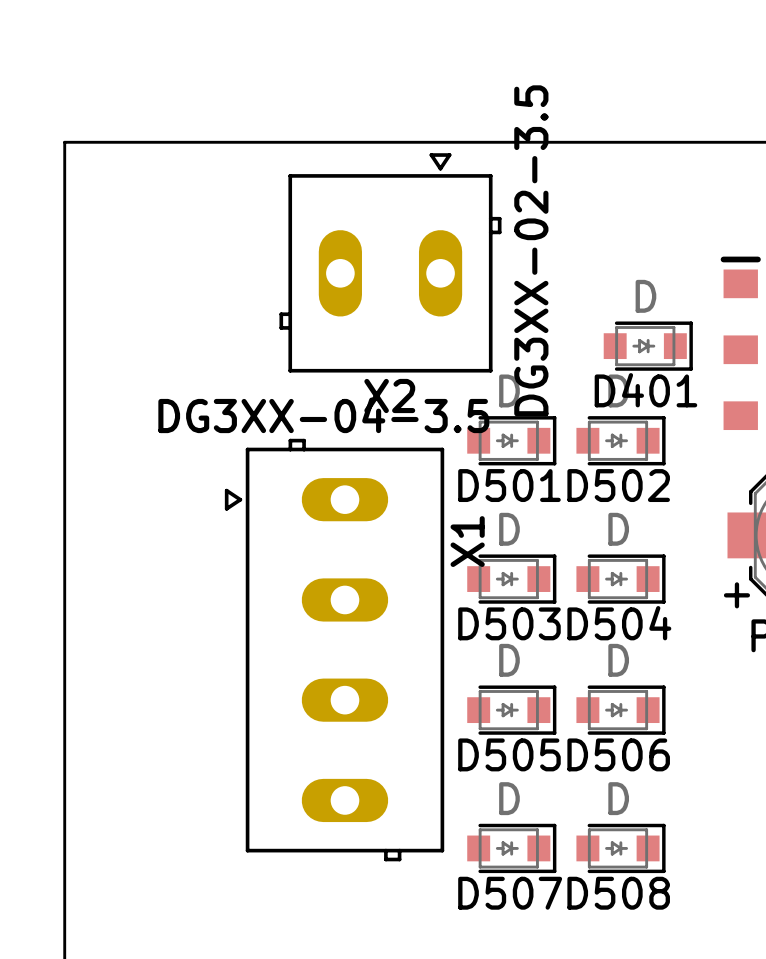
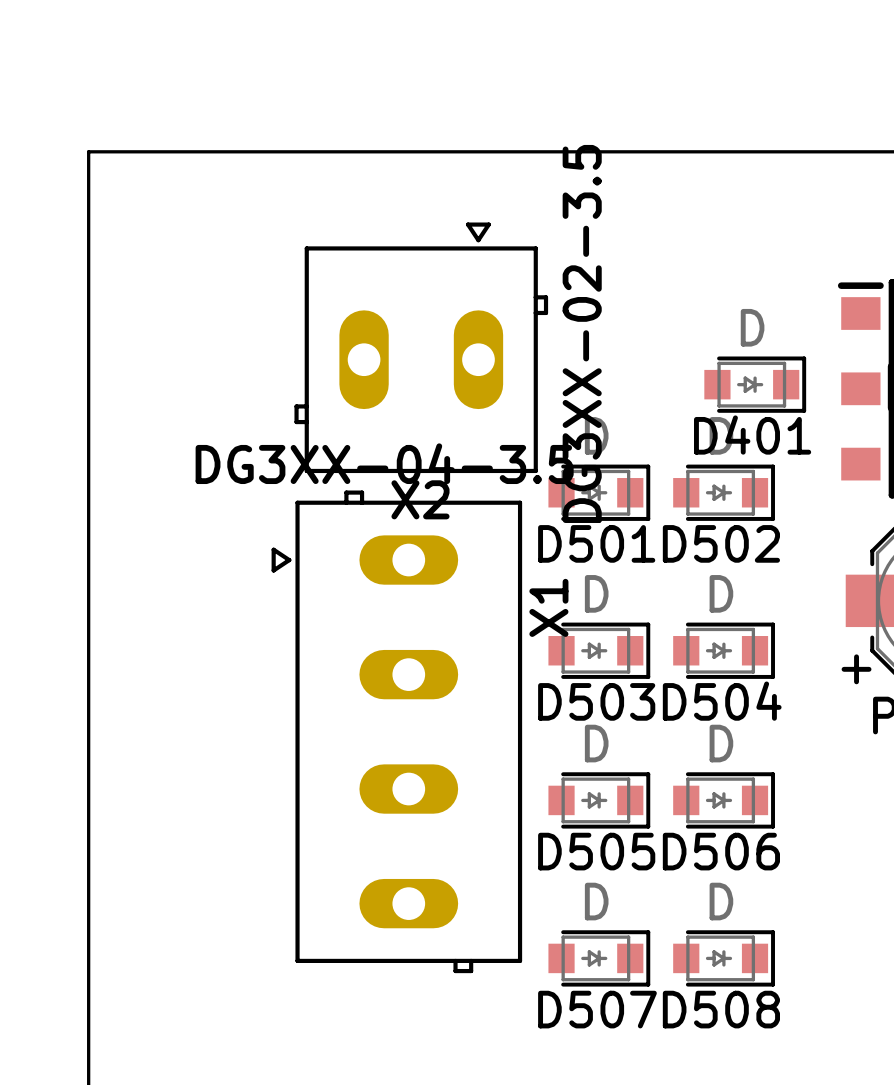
X2 position: (390, 262) -> (421, 347)

